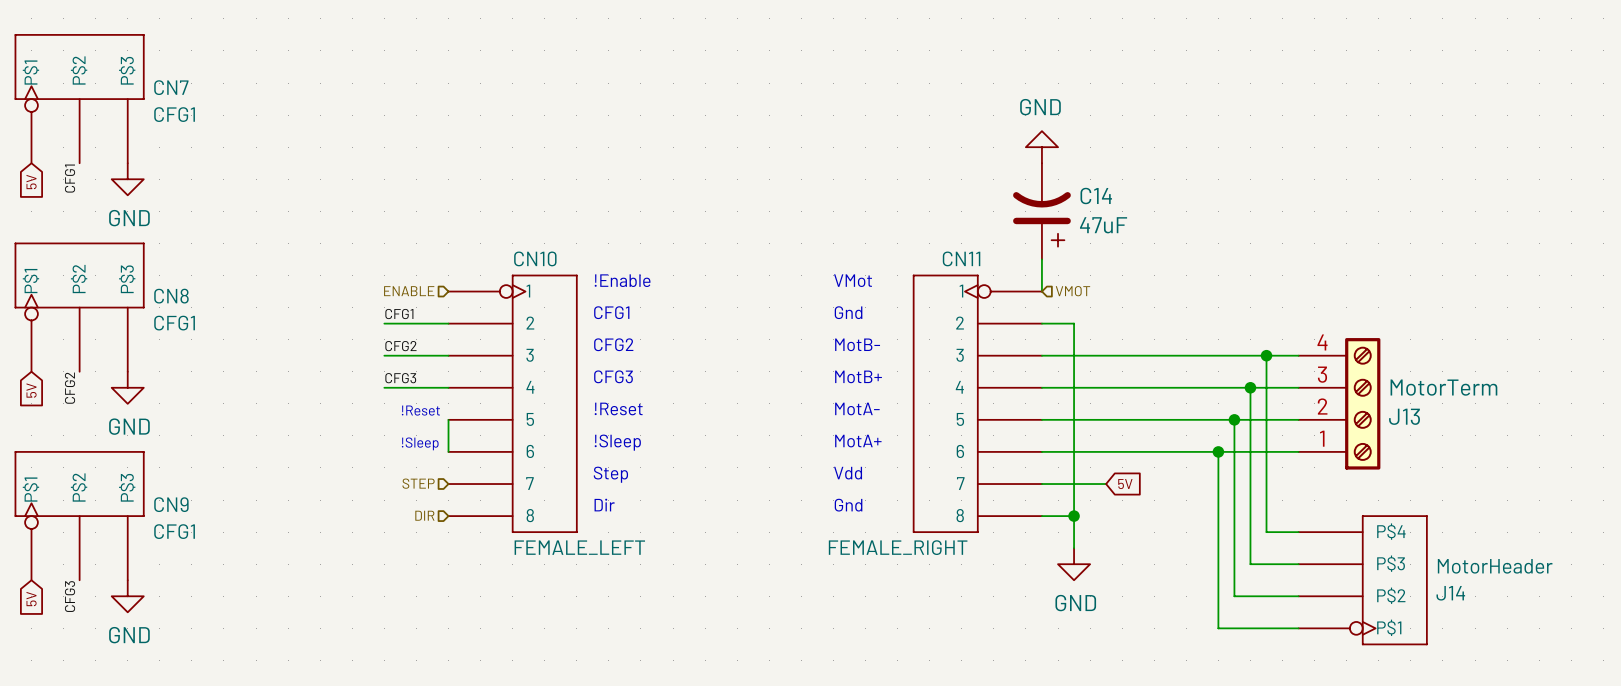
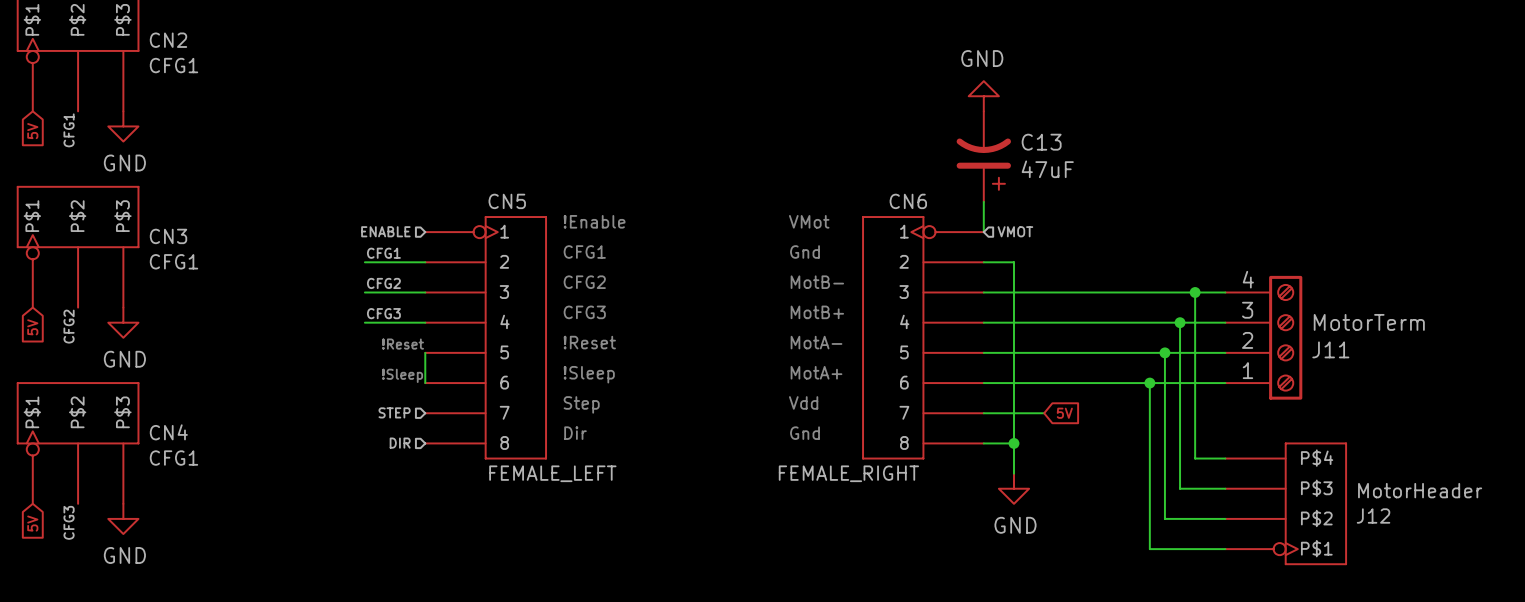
CN7 name: CN7 (171, 87) -> CN2 (168, 40)
C14 name: C14 (1096, 196) -> C13 (1041, 142)
CN10 name: CN10 (535, 258) -> CN5 (507, 201)
CN11 name: CN11 (961, 258) -> CN6 (908, 201)
CN8 name: CN8 (171, 296) -> CN3 (168, 236)
J13 name: J13 (1404, 416) -> J11 (1330, 349)
CN9 name: CN9 (171, 504) -> CN4 (168, 432)
J14 name: J14 (1450, 593) -> J12 (1373, 515)

